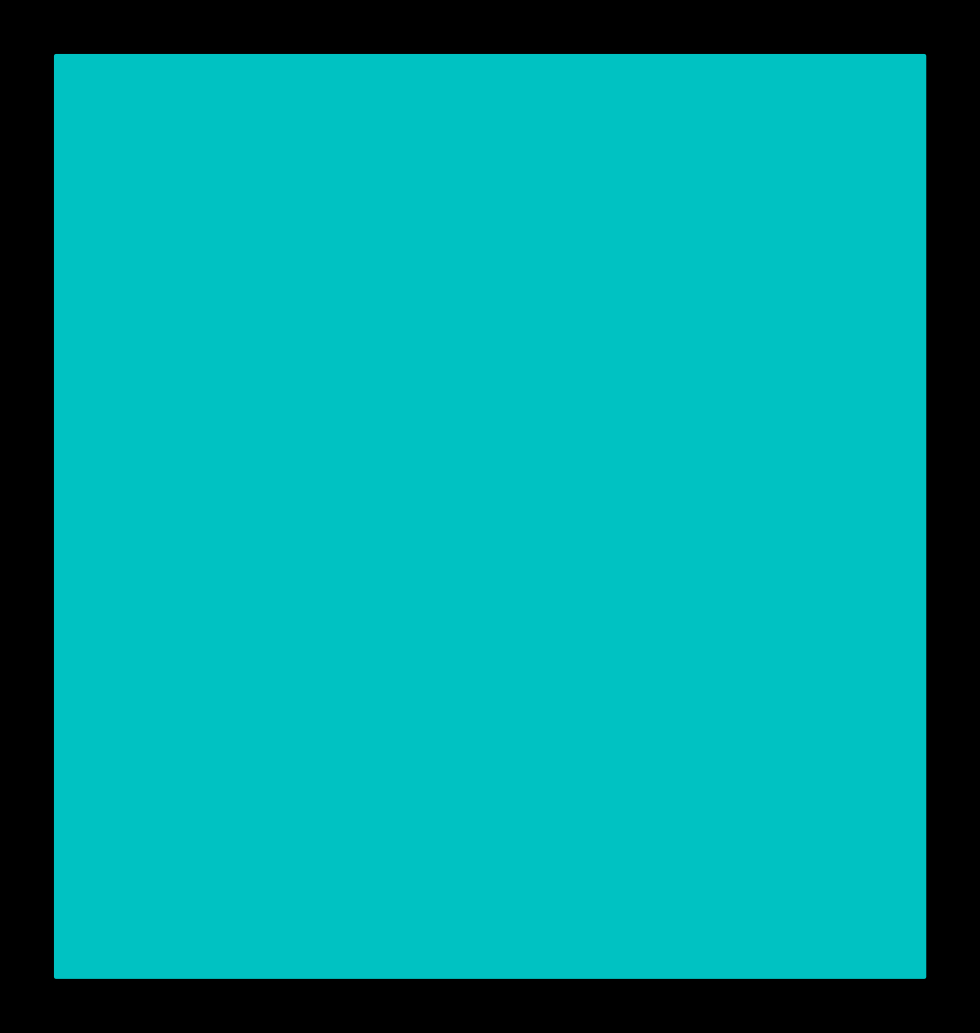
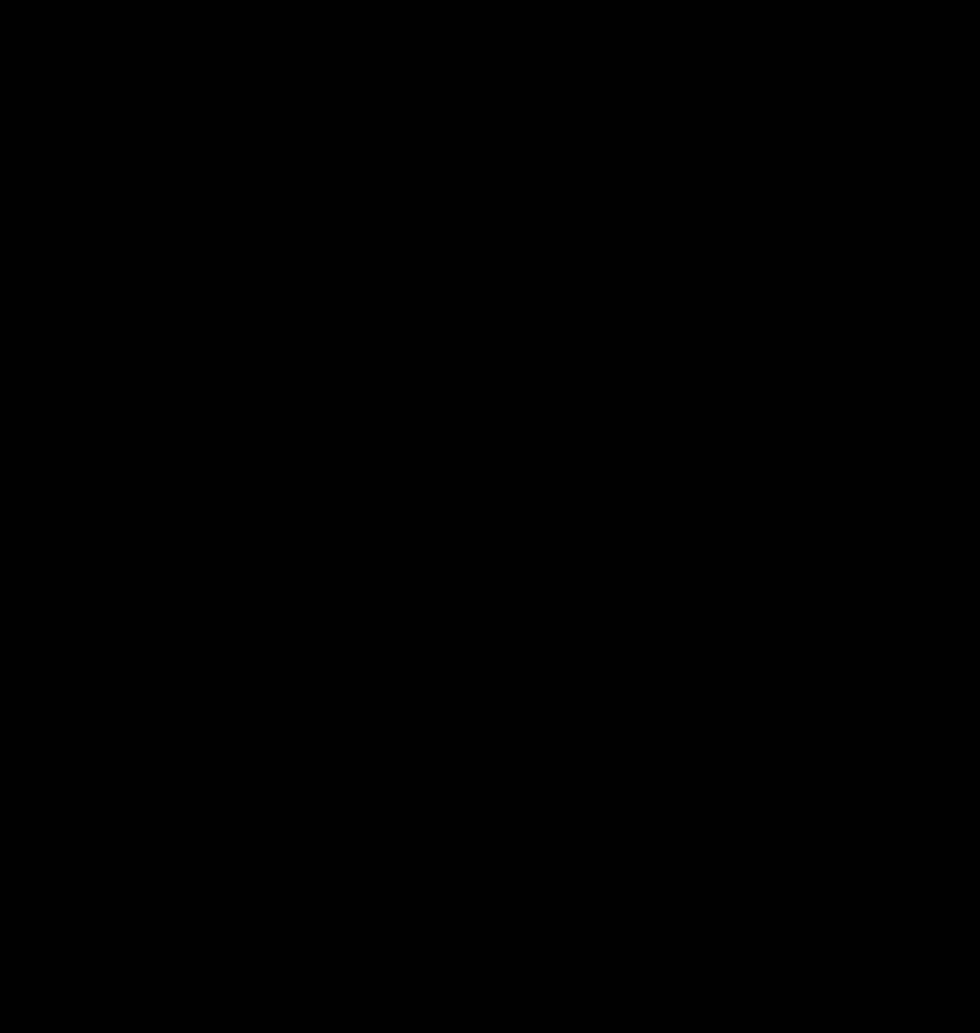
drawing: [53, 53, 927, 979] -> none

